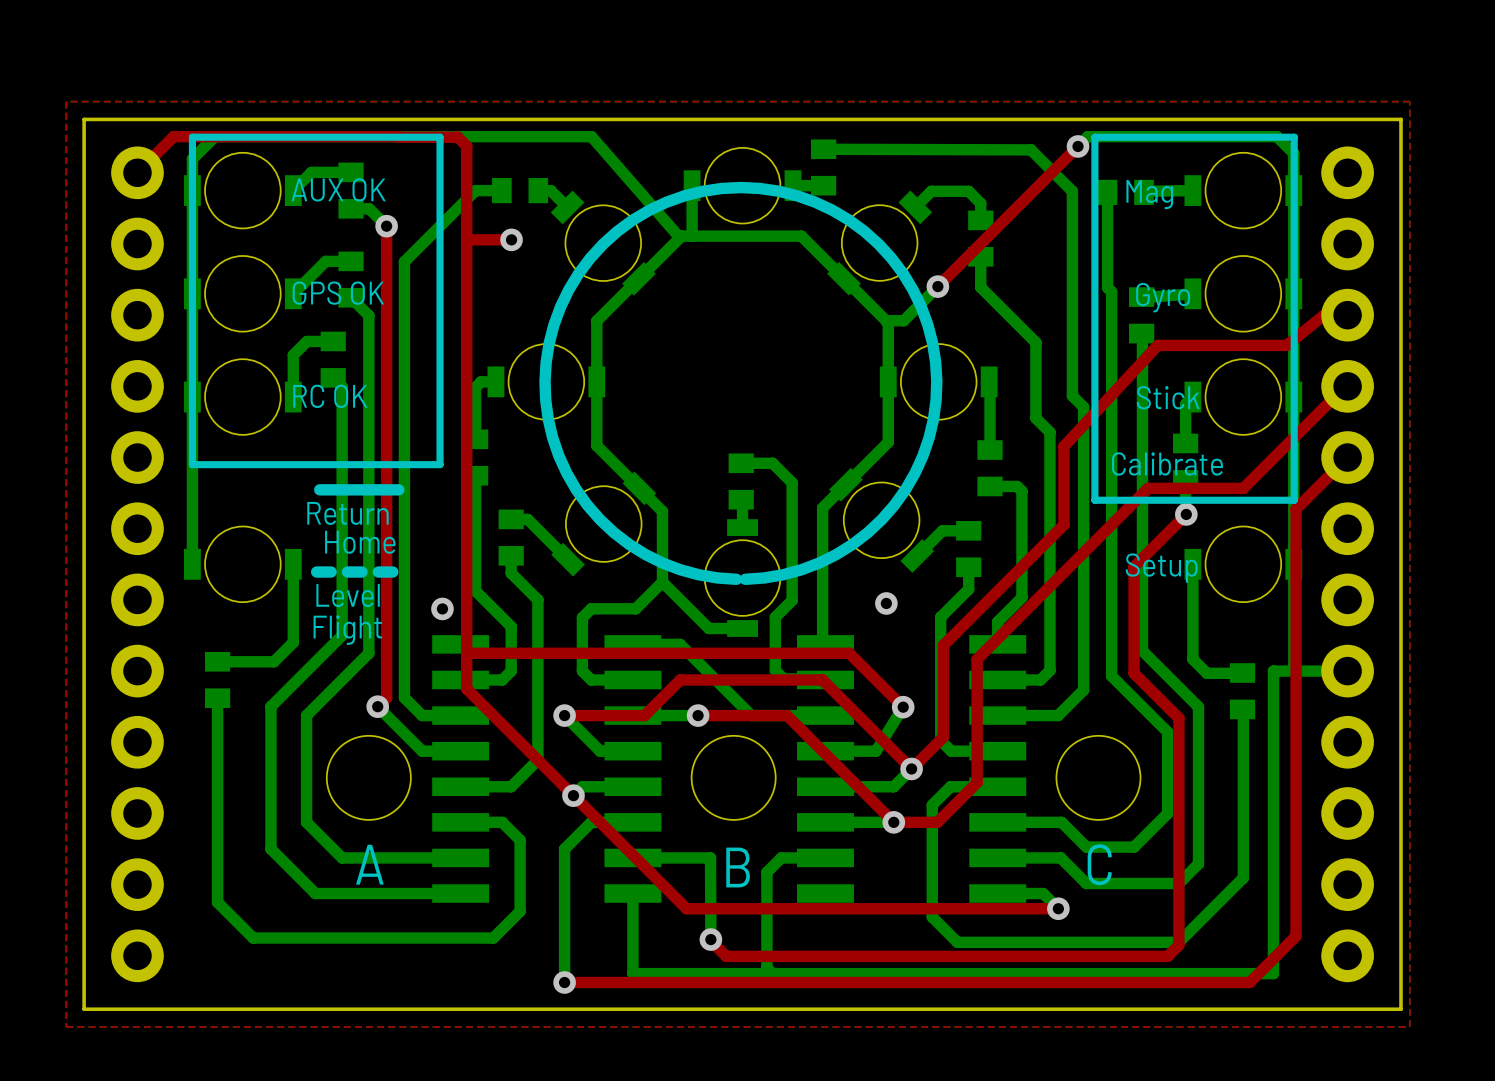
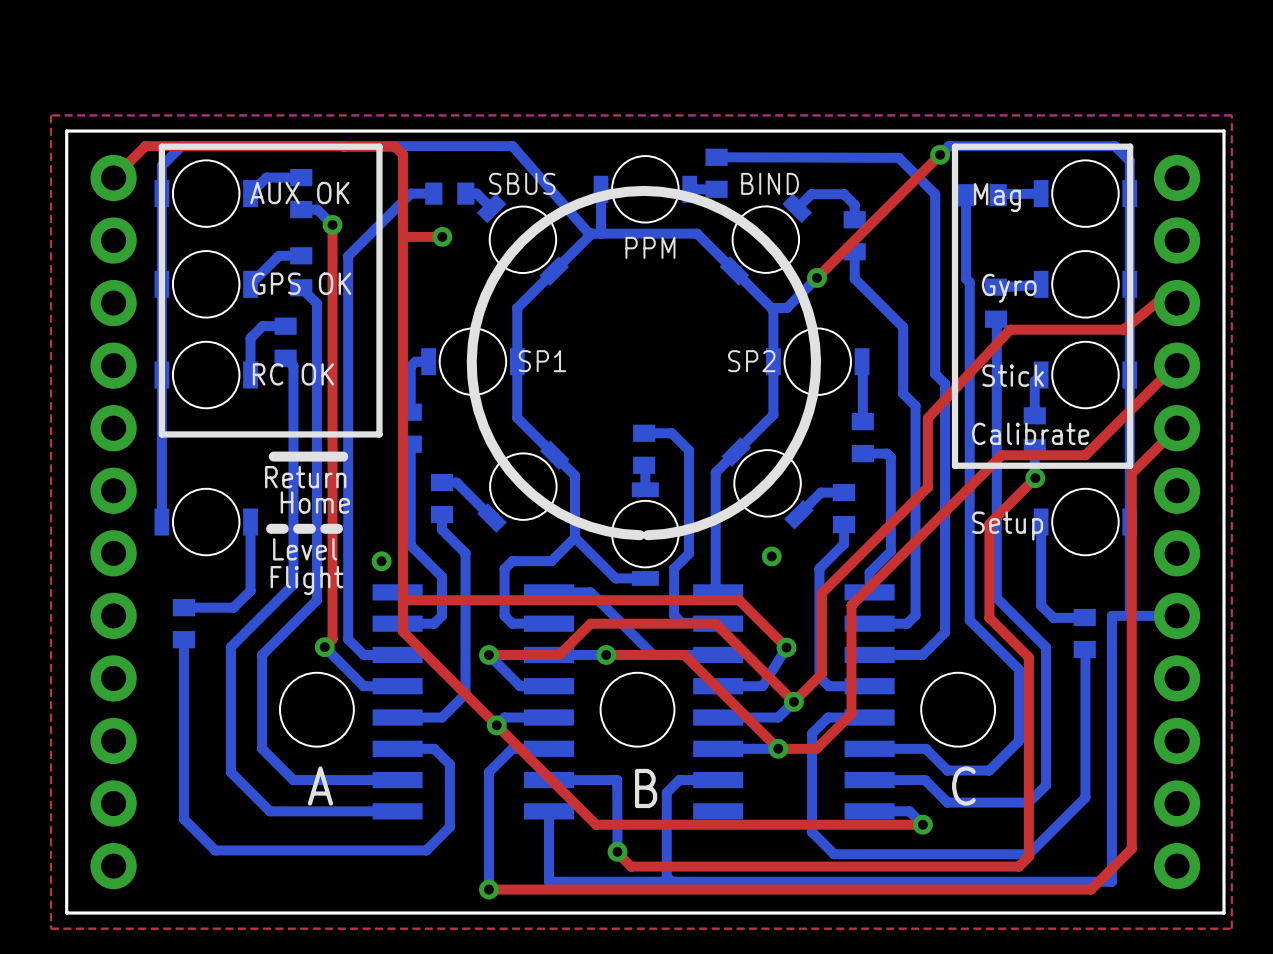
text: none -> SBUS (522, 183)
text: none -> BIND (770, 183)
text: none -> PPM (650, 247)
text: none -> SP1 (542, 361)
text: none -> SP2 (751, 361)

